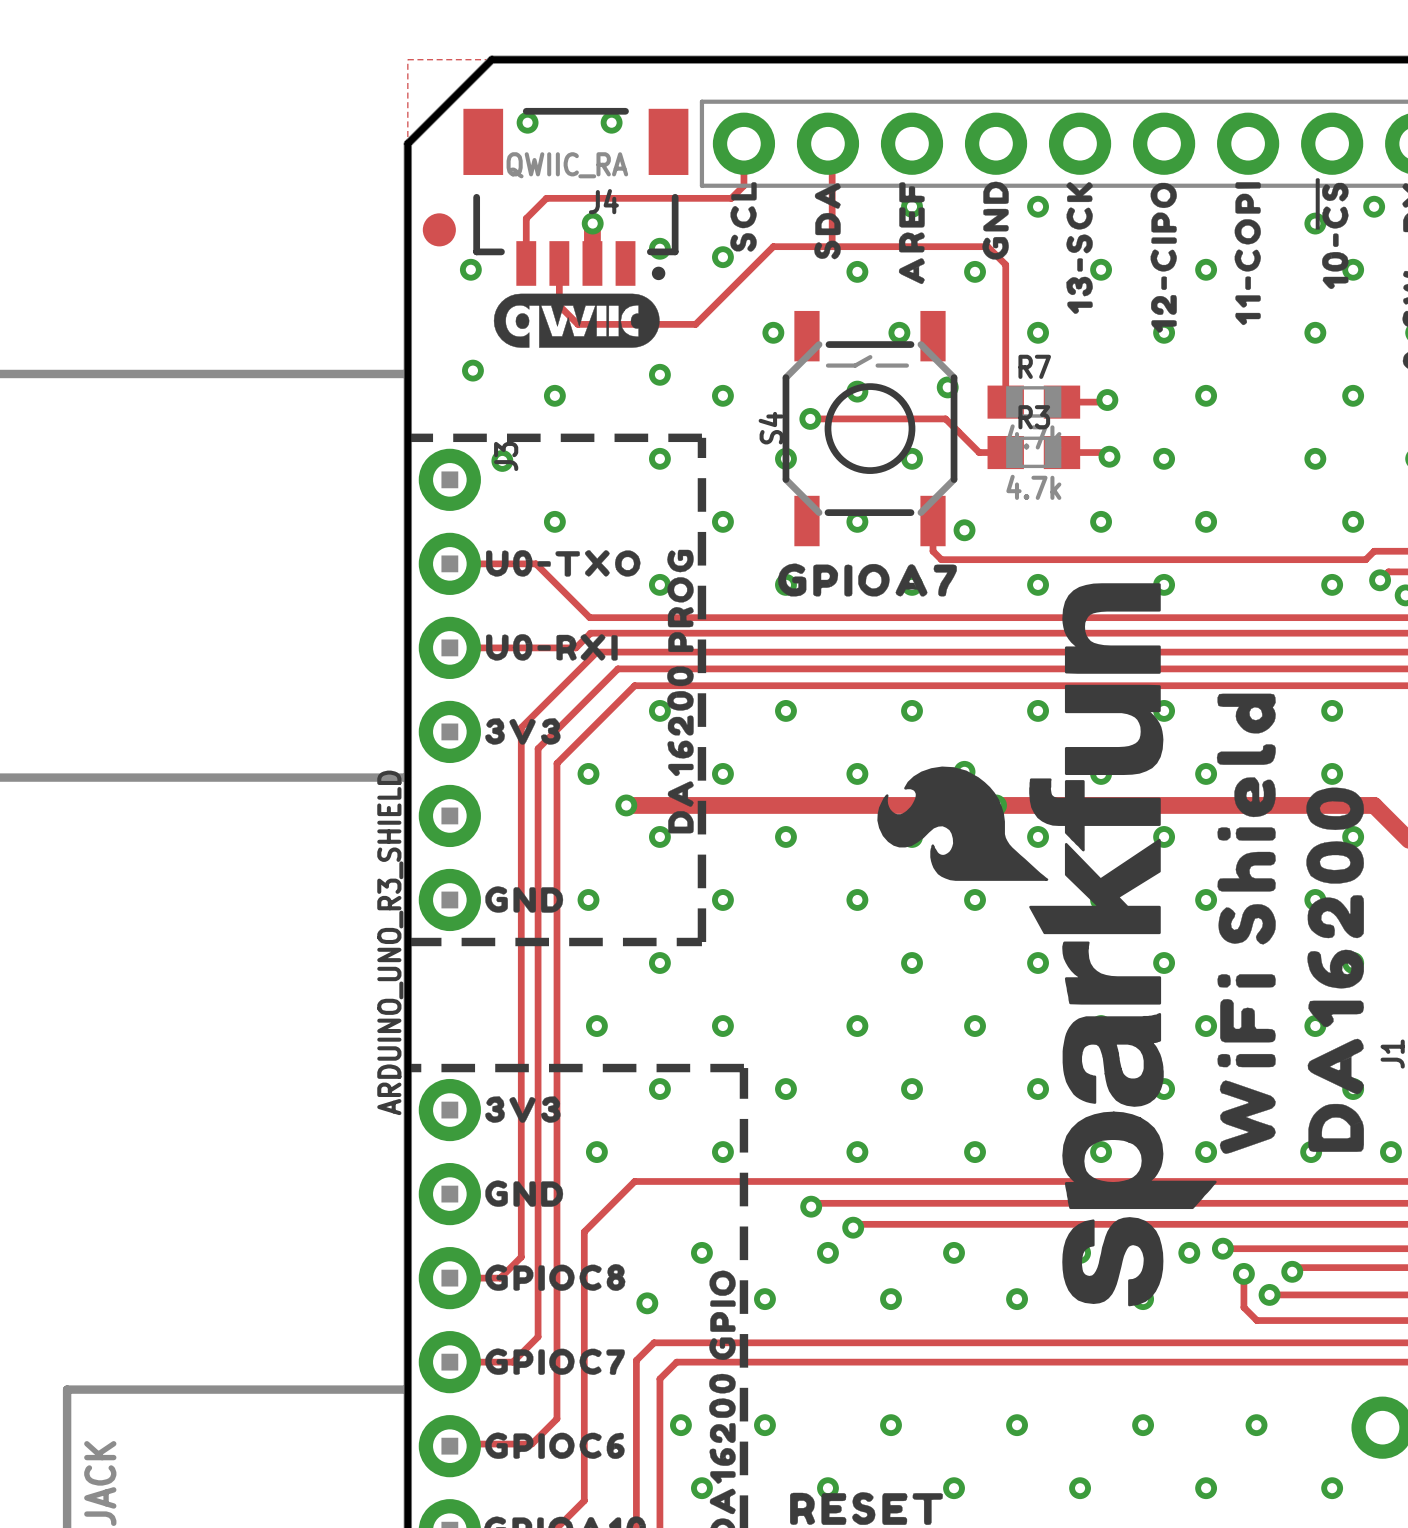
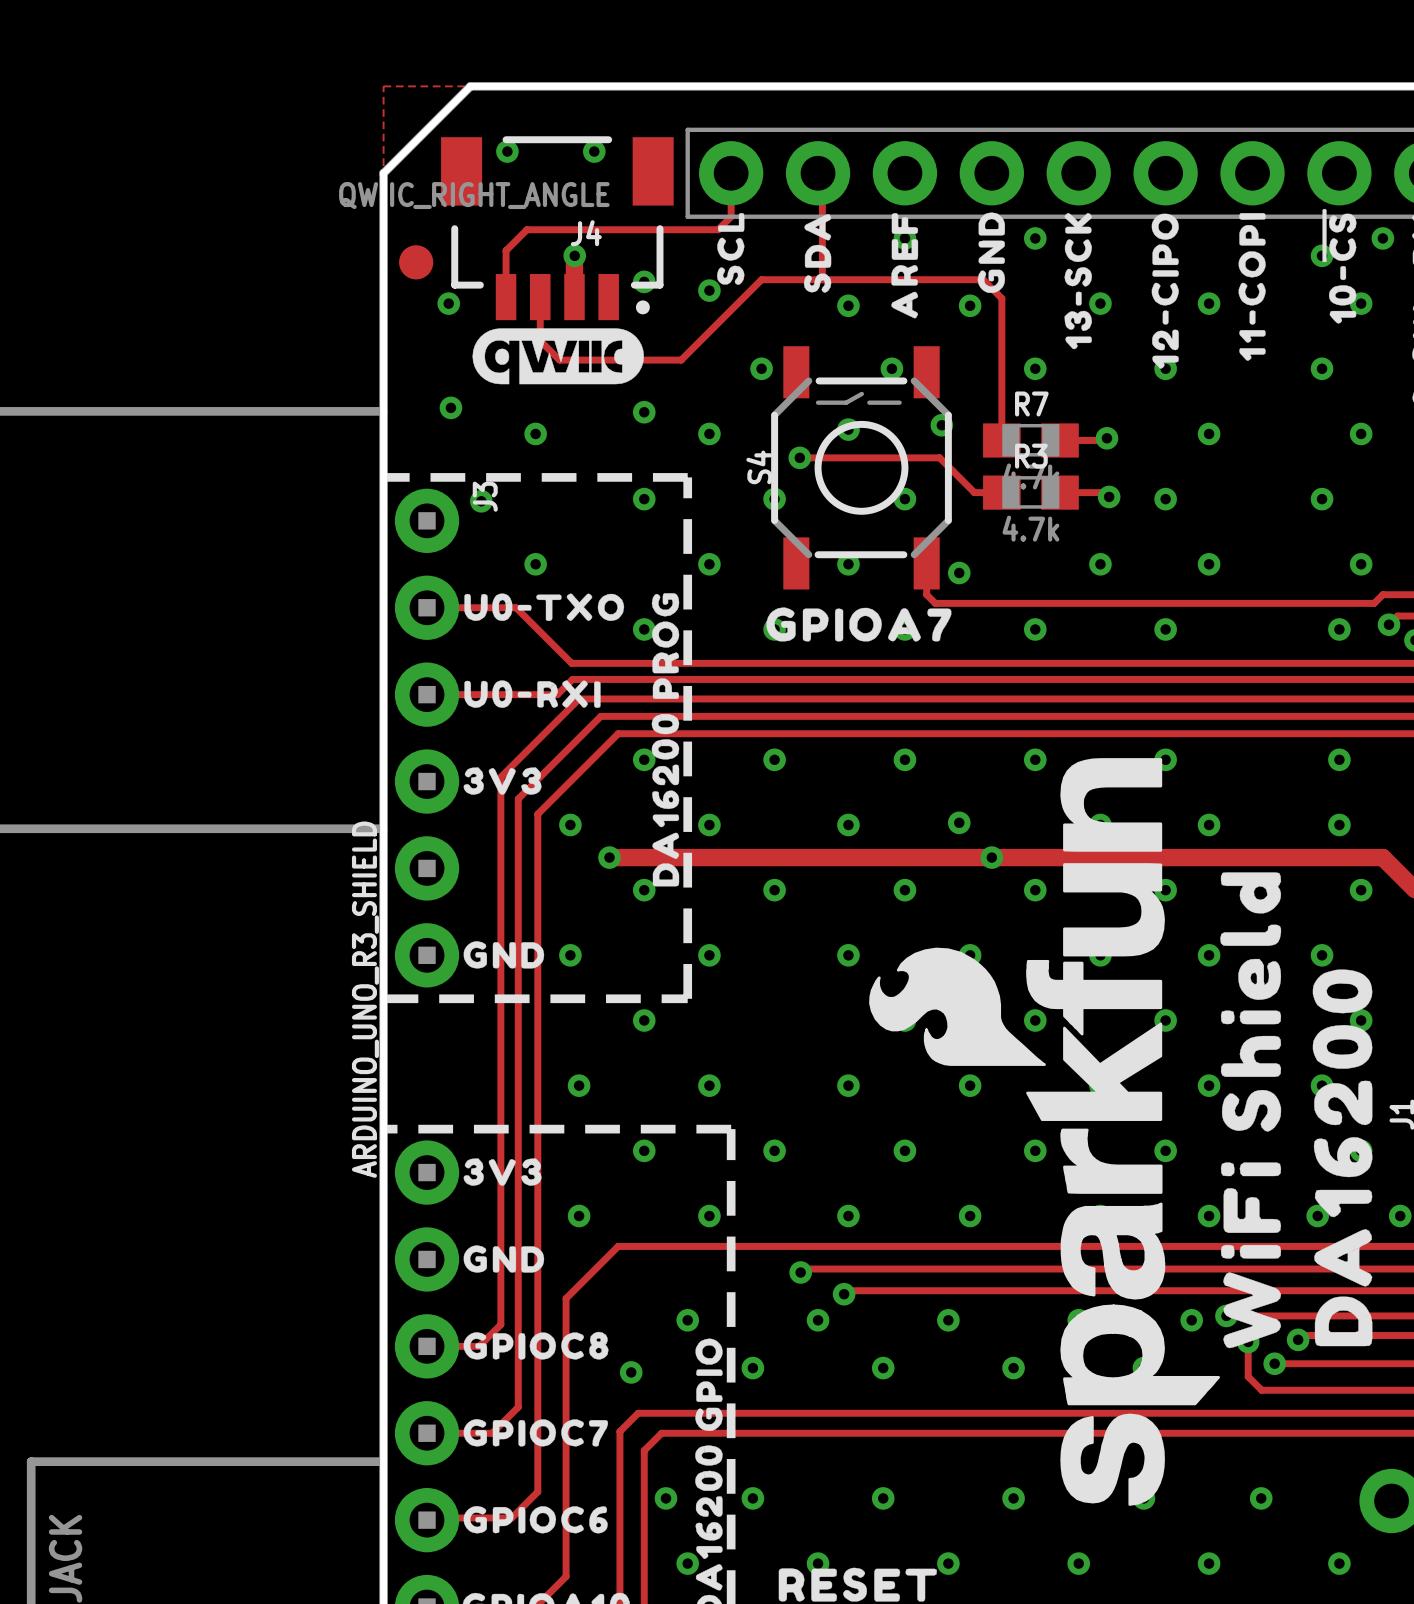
J4 value: QWIIC_RA (567, 165) -> QWIIC_RIGHT_ANGLE (474, 195)
drawing position: (1246, 923) -> (1250, 1110)
drawing position: (1047, 944) -> (1044, 1131)
drawing position: (1335, 969) -> (1342, 1157)

